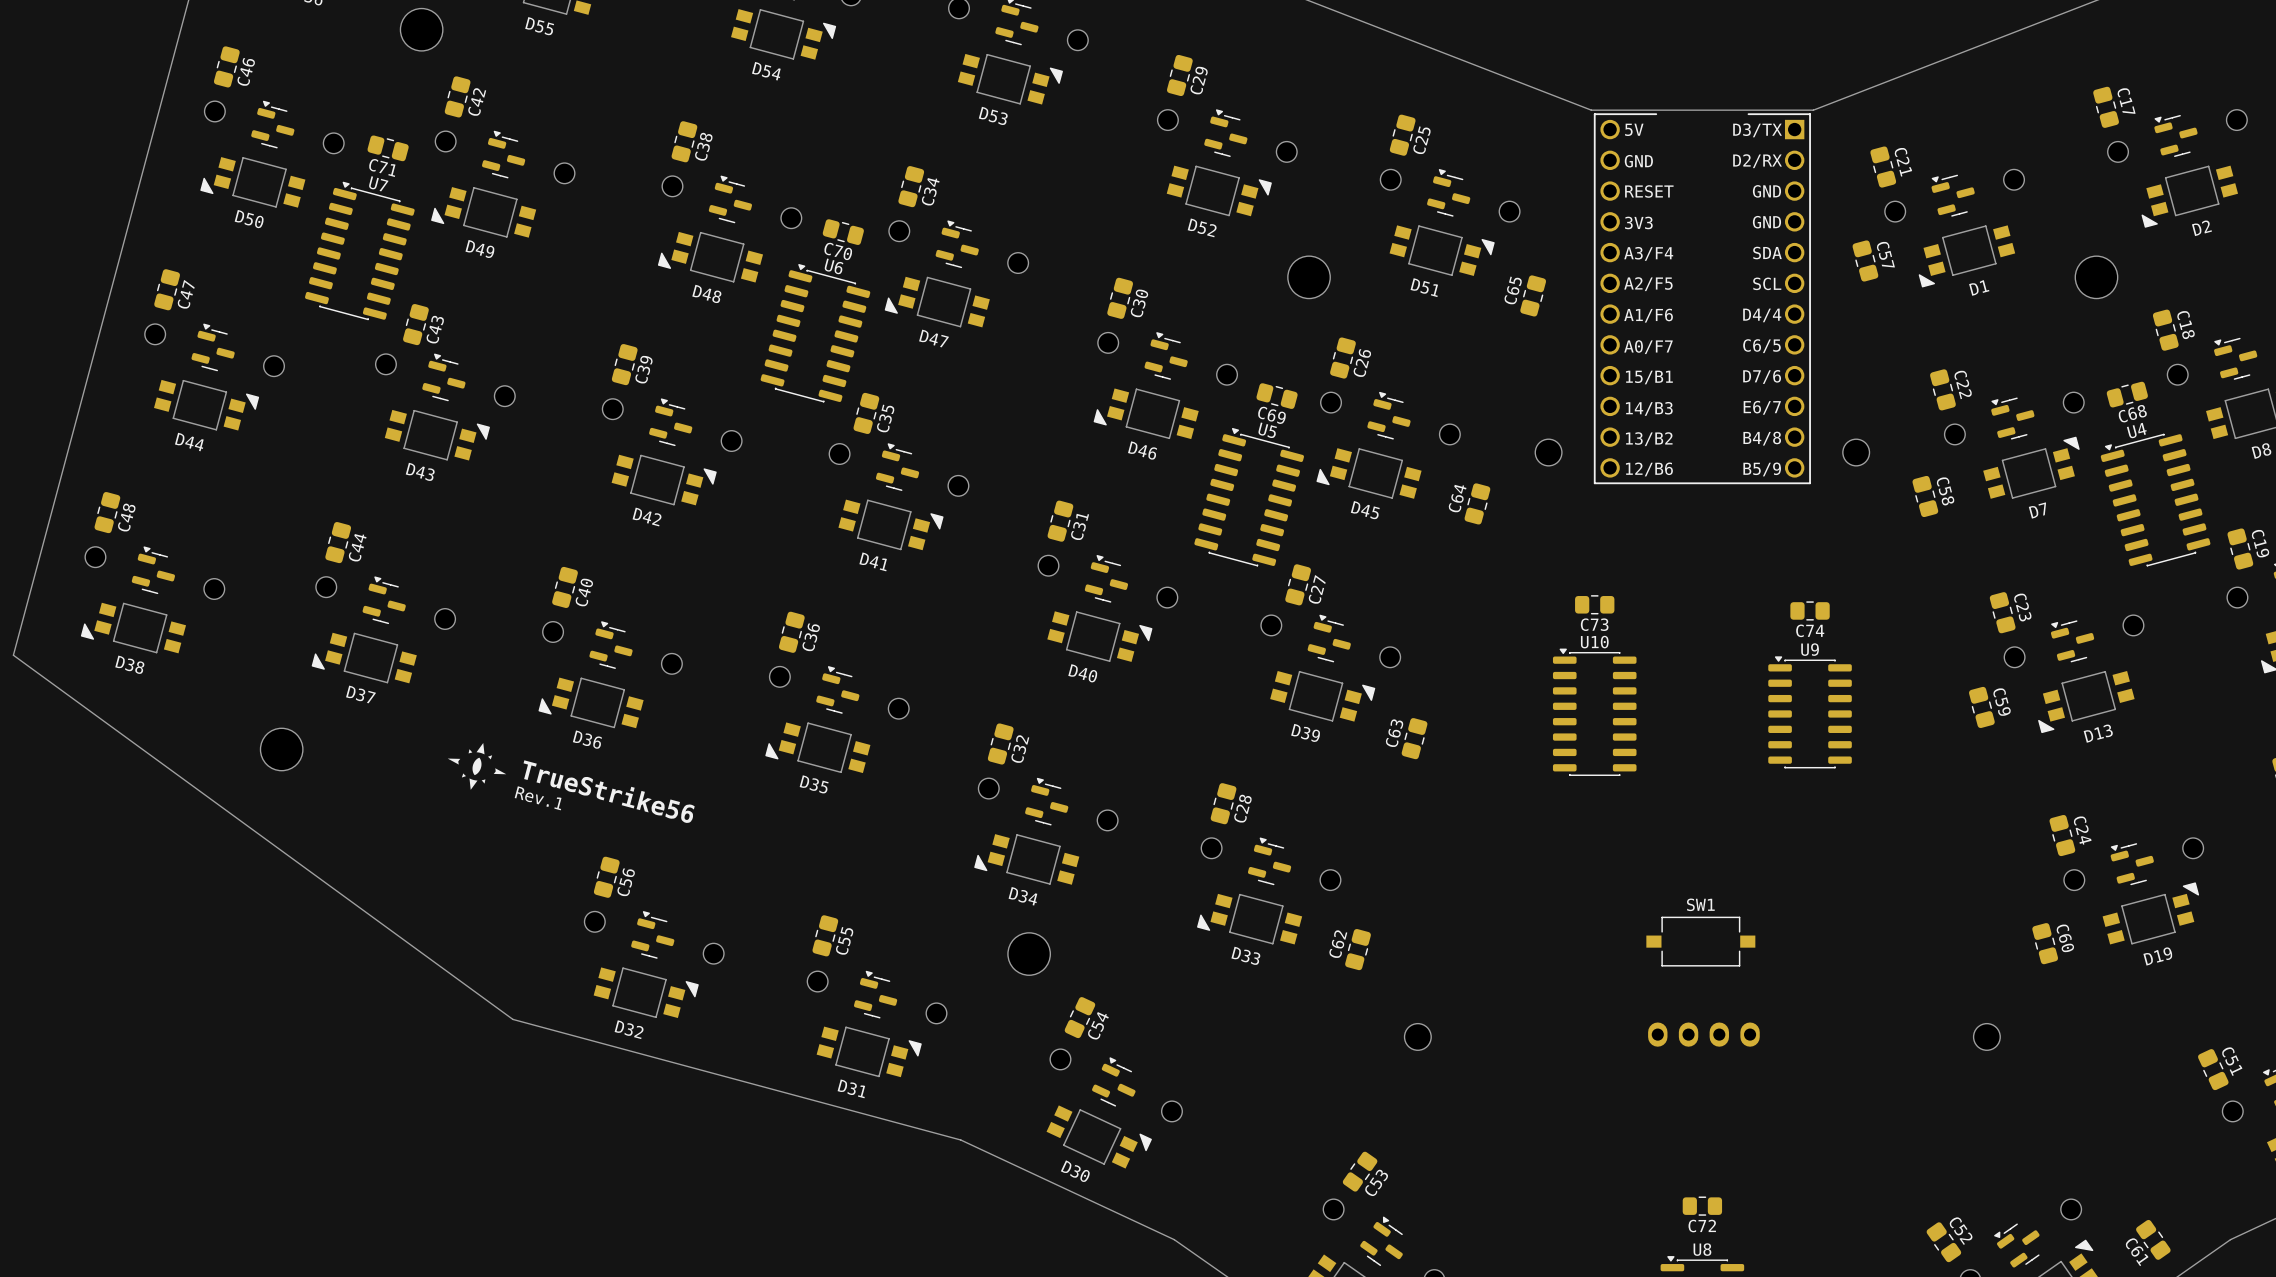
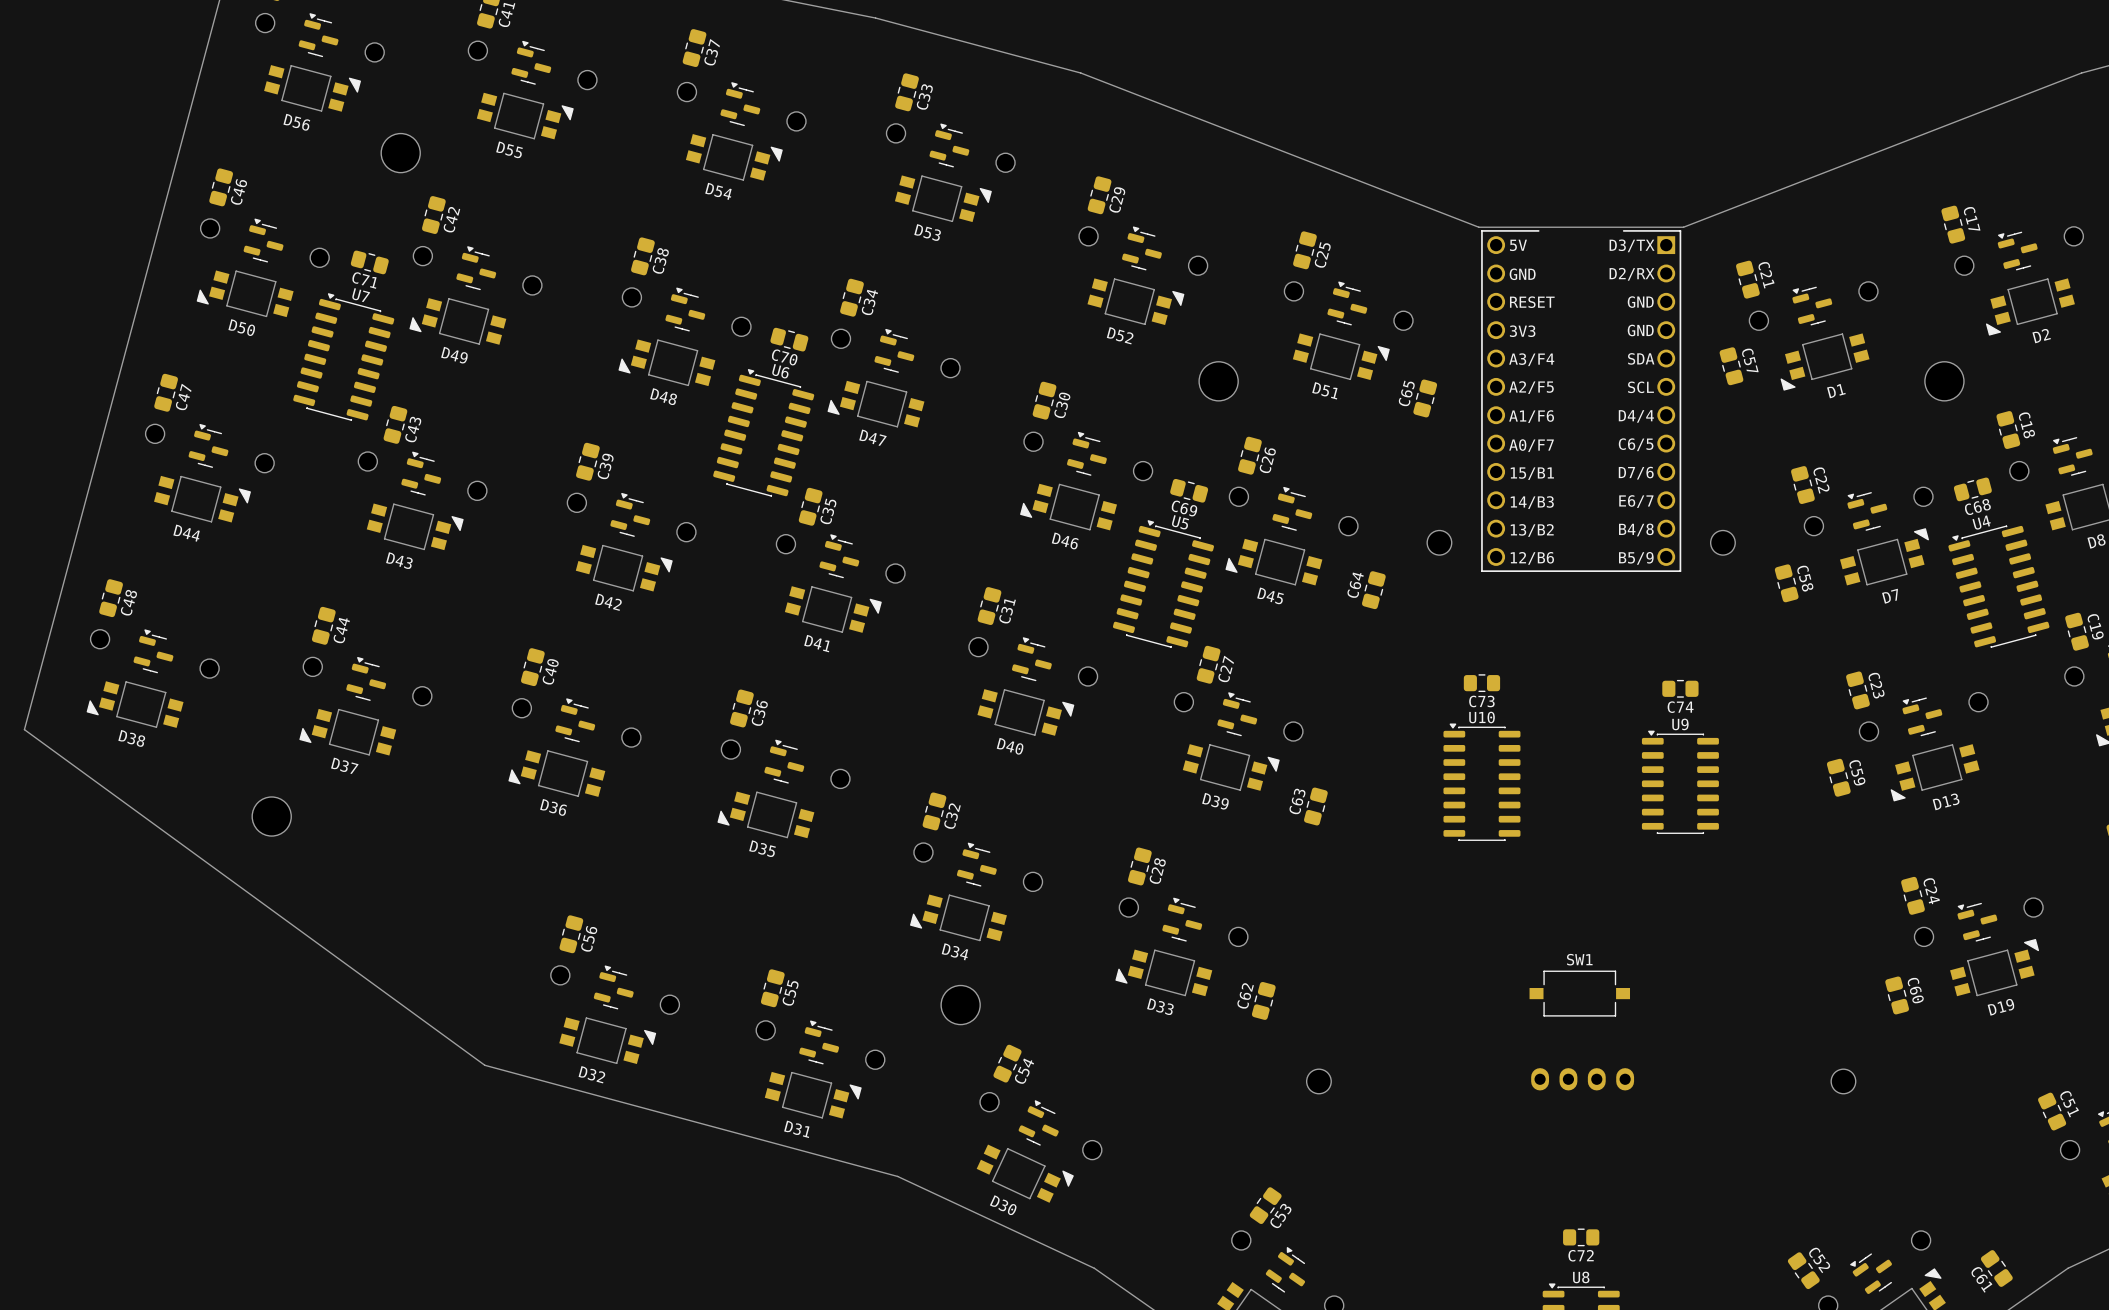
drawing: [447, 743, 507, 790] -> none
text: TrueStrike56 (609, 791) -> none
text: Rev.1 (538, 798) -> none

